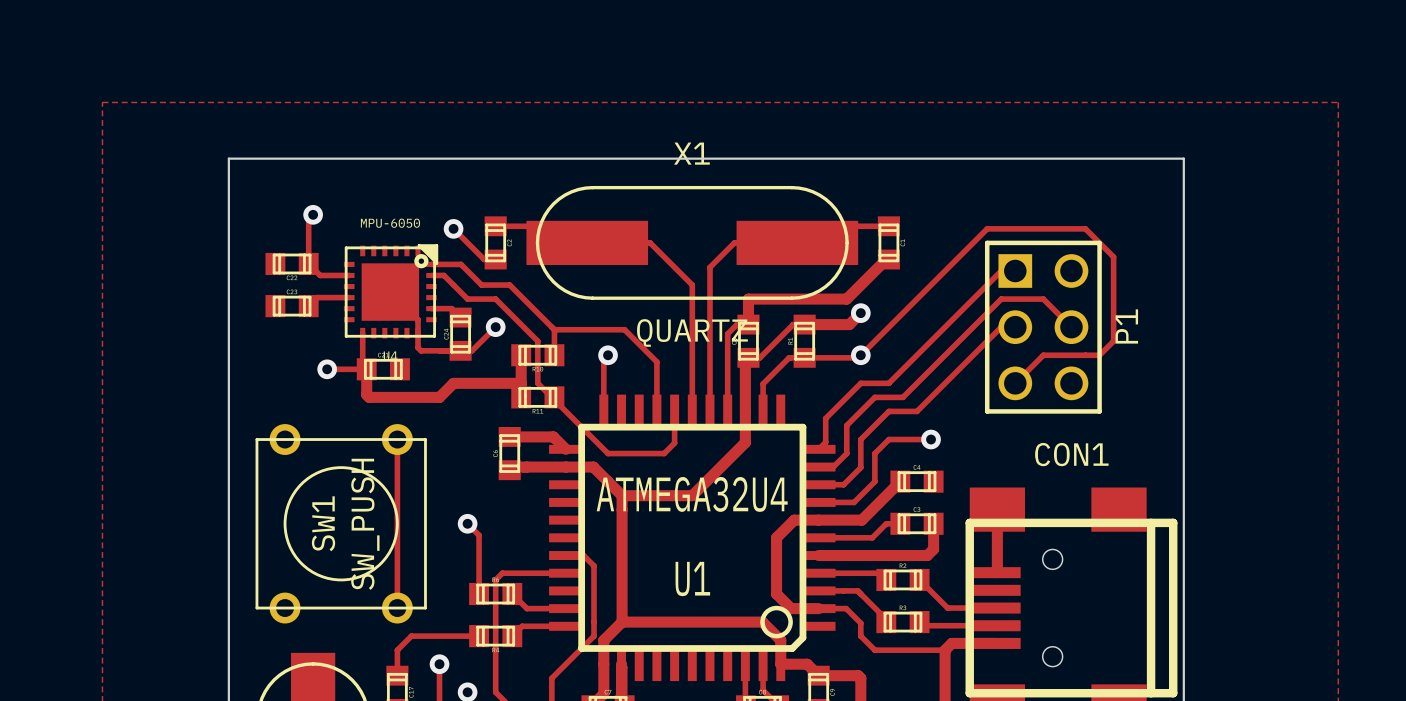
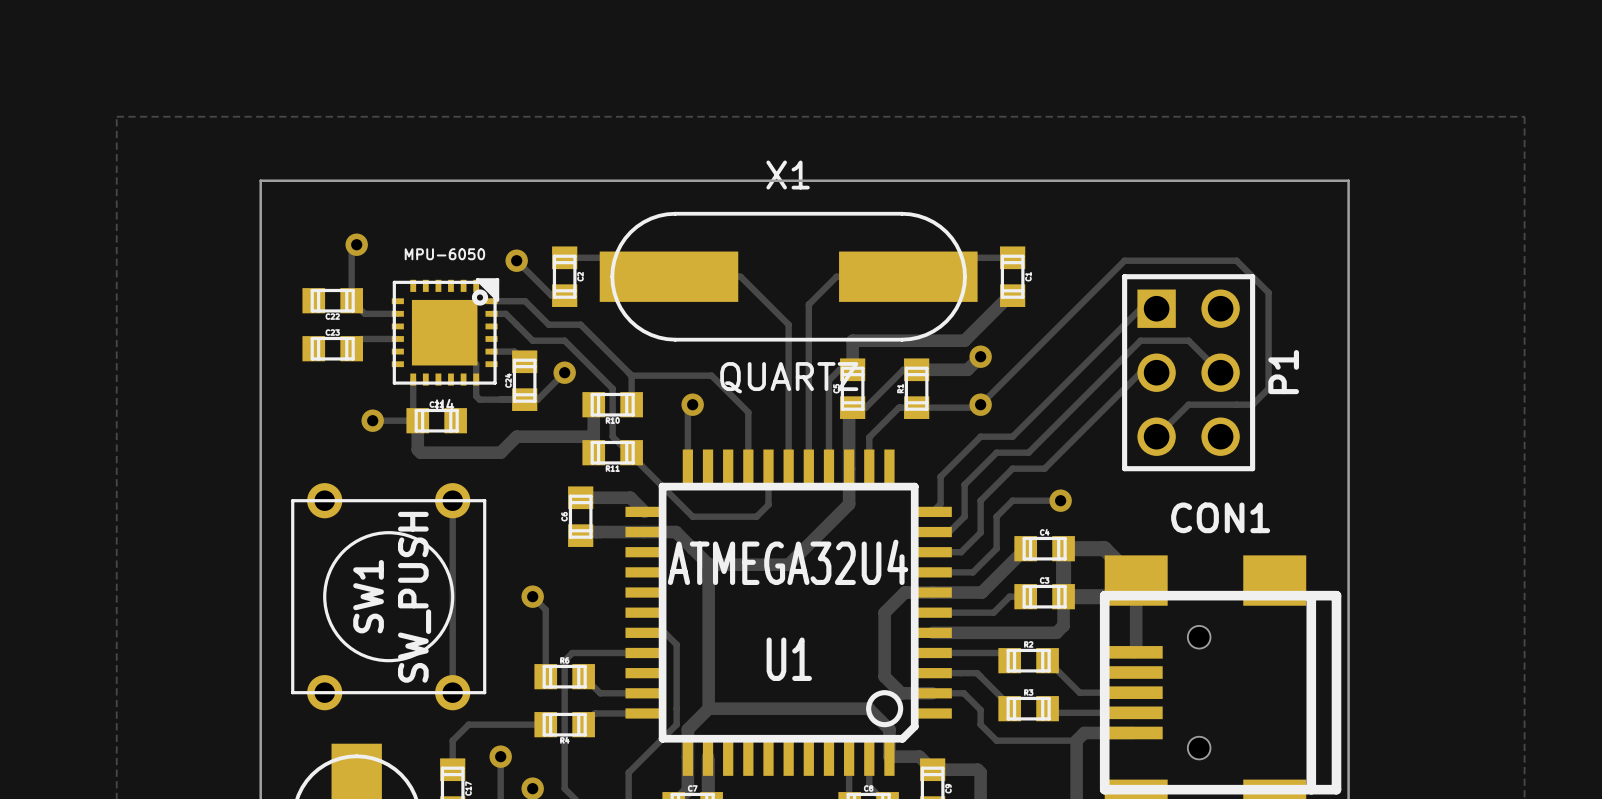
track: none -> (1063, 548) (1063, 596) (1120, 596) (1136, 580) (1104, 548) (1063, 548)

